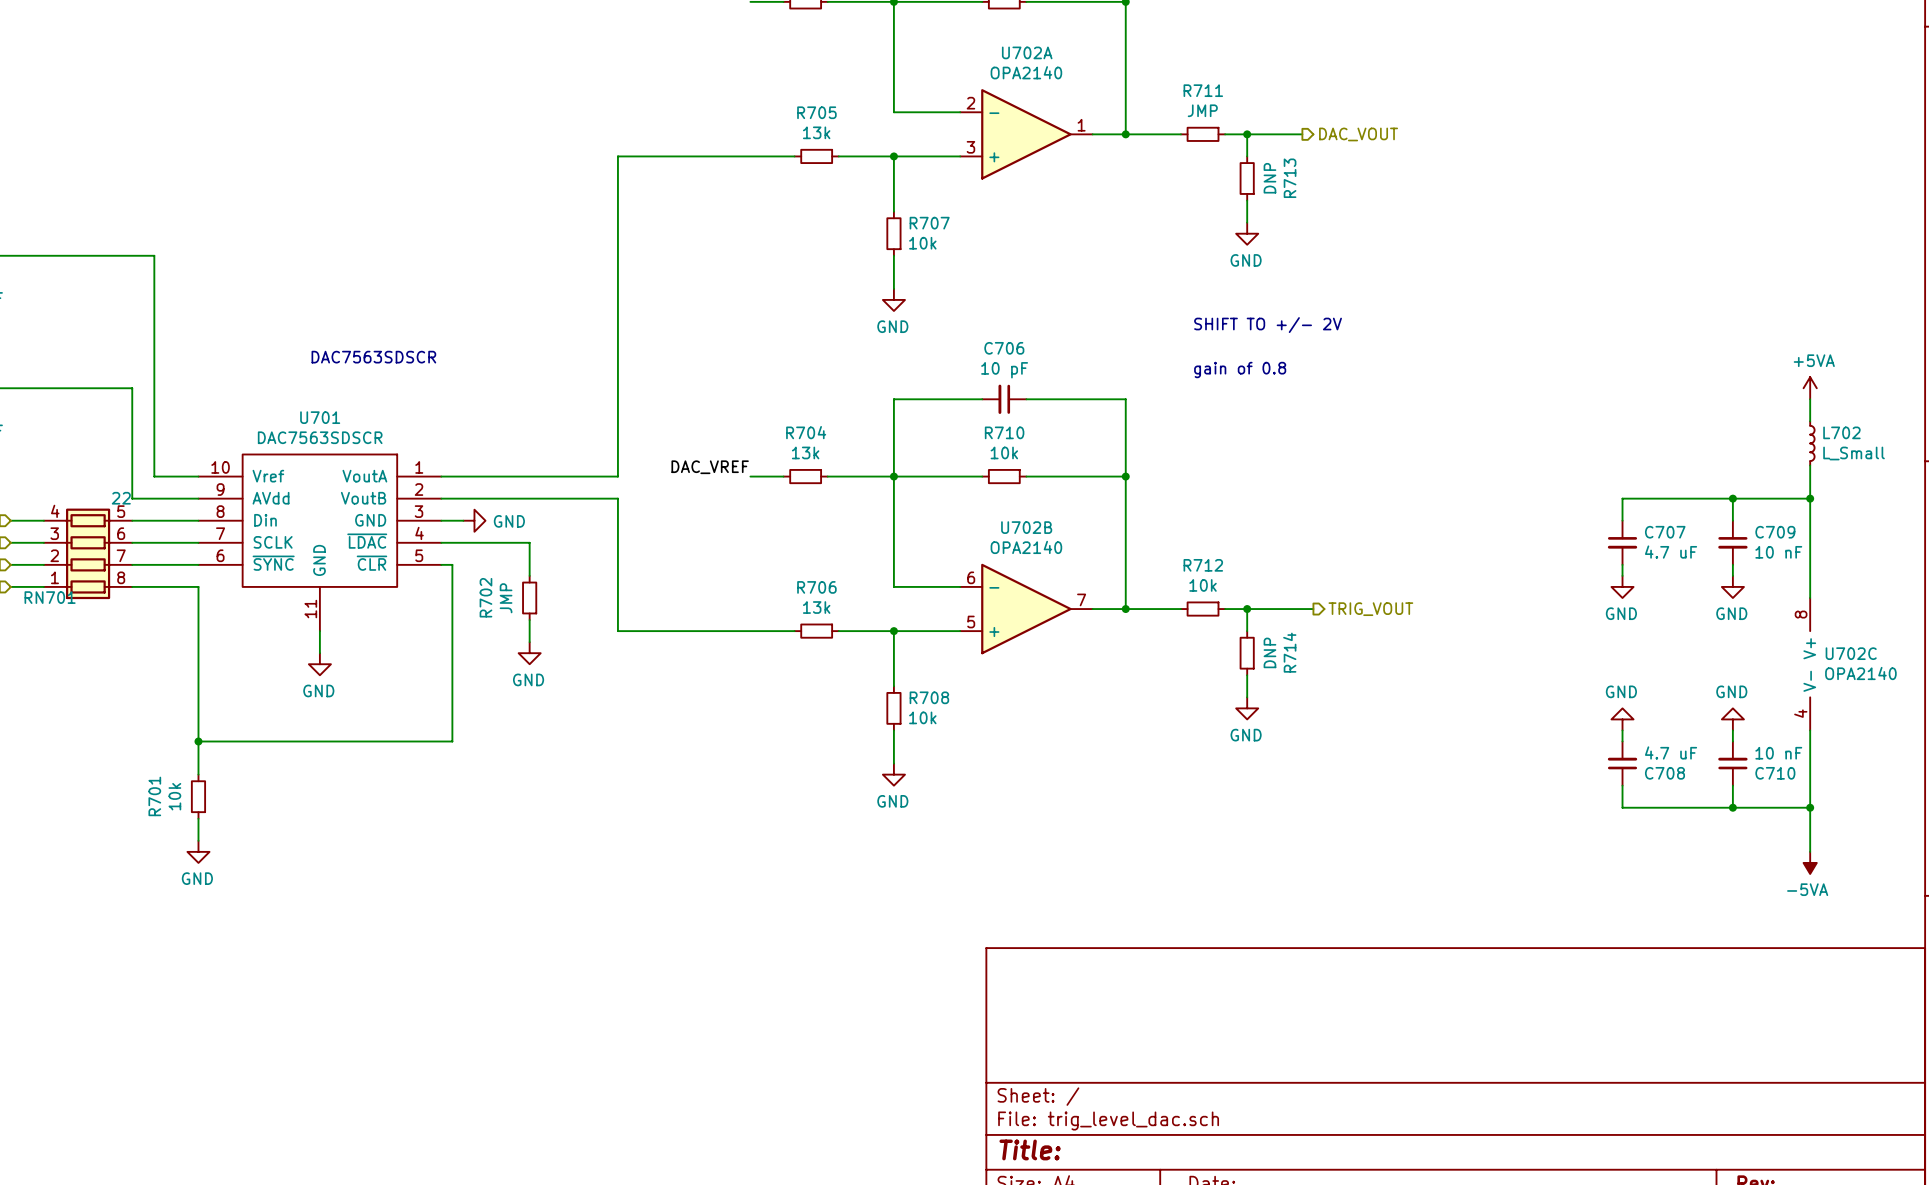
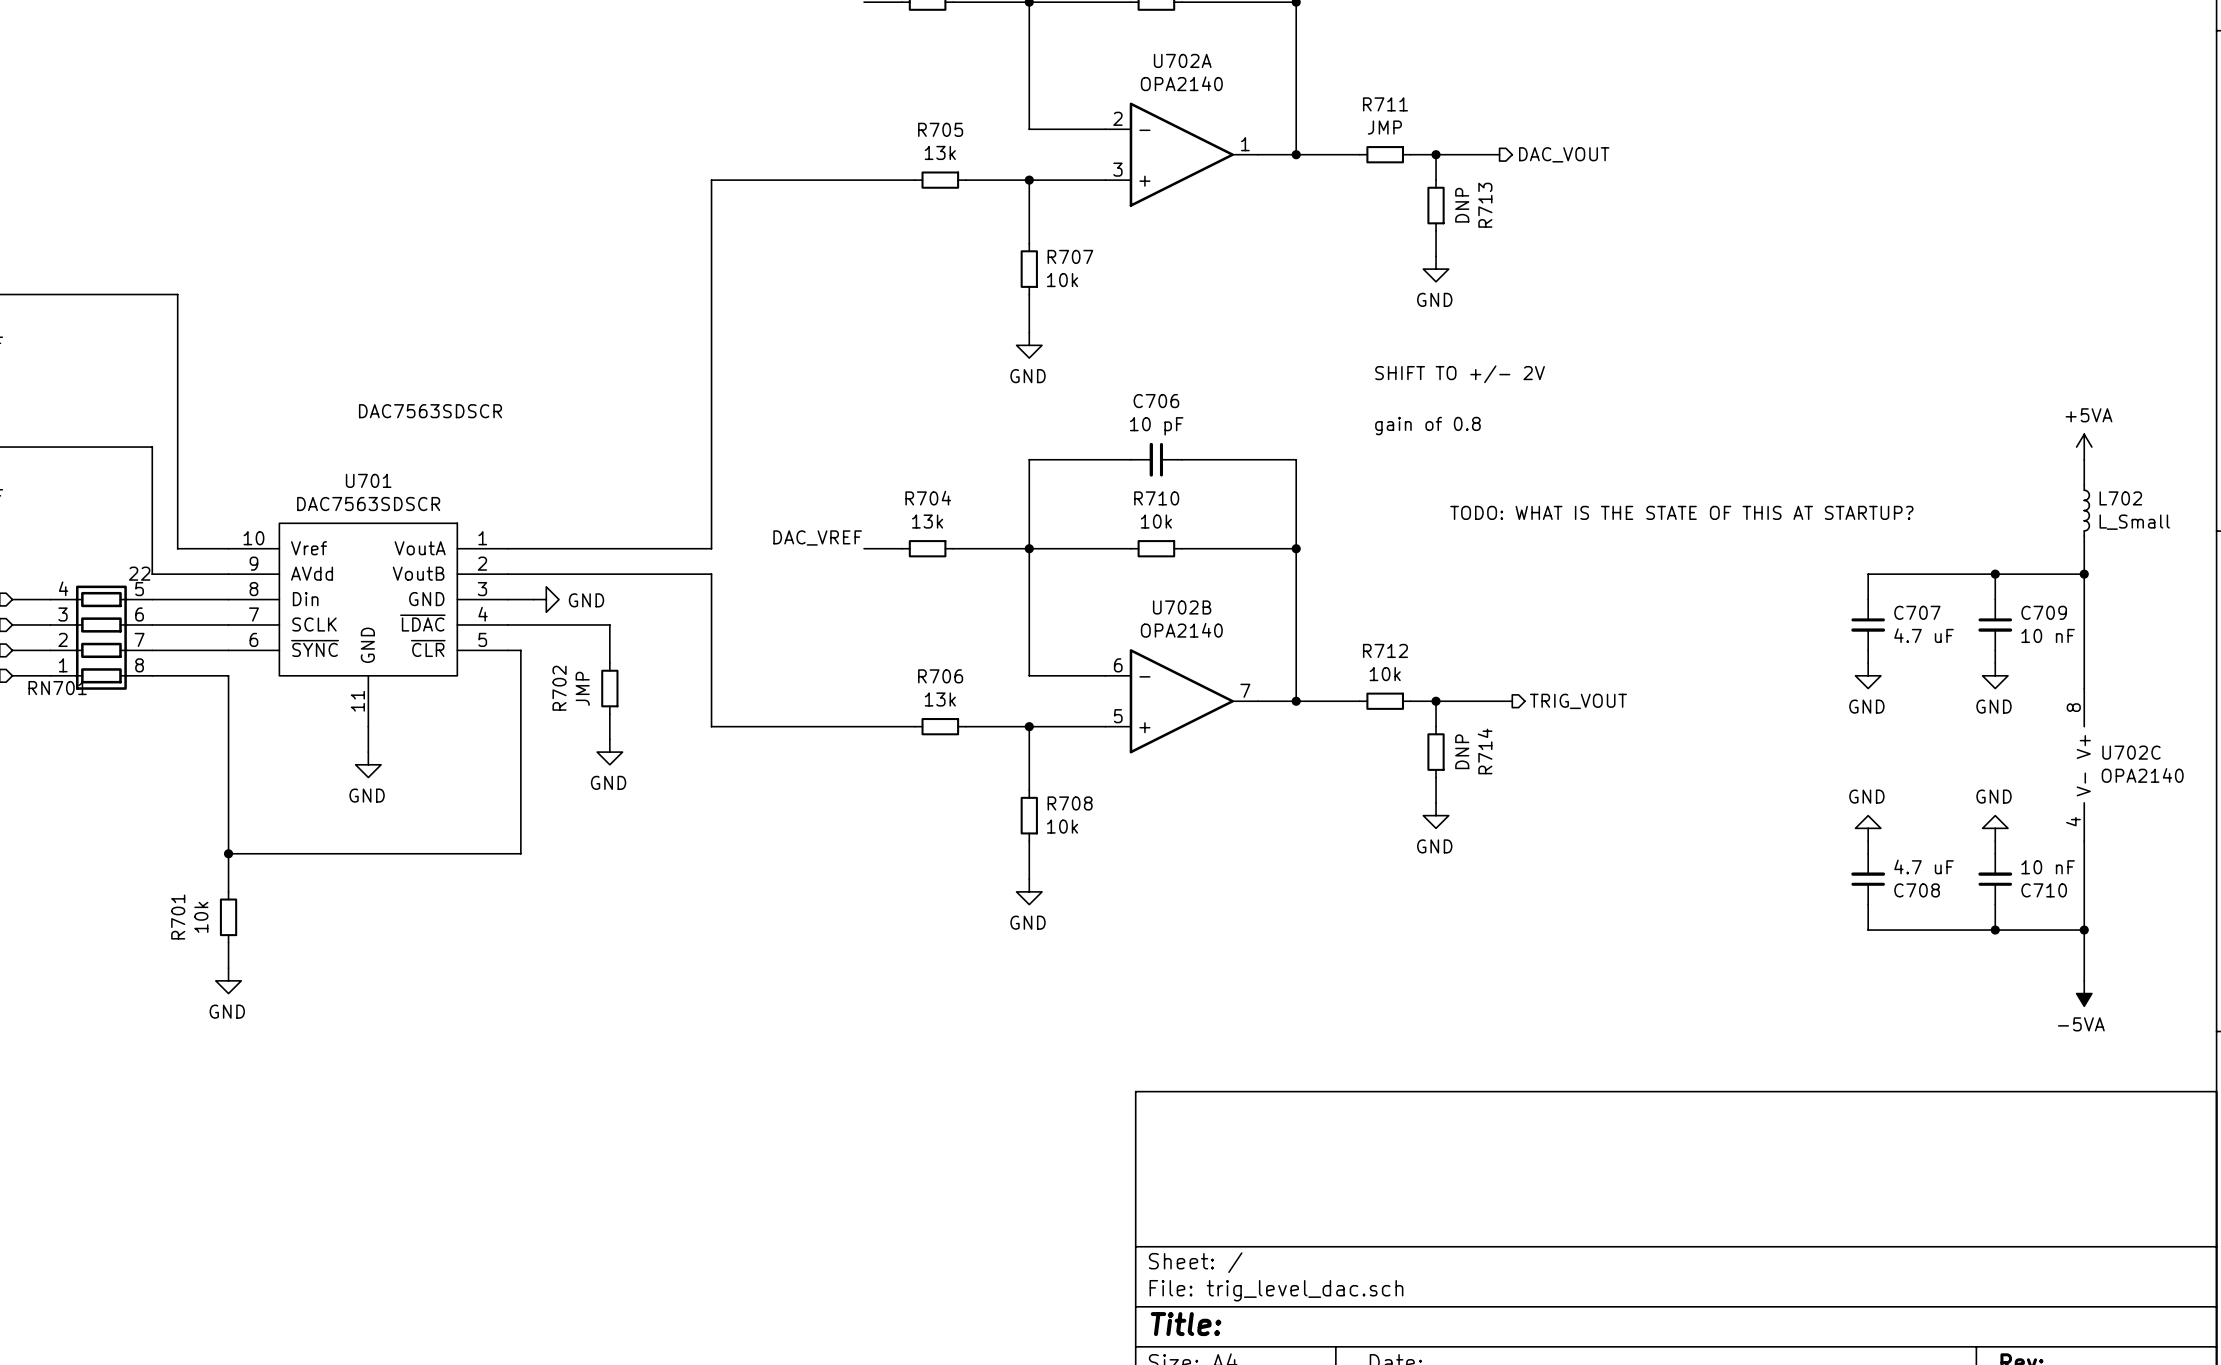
text: none -> TODO: WHAT IS THE STATE OF THIS AT STARTUP? (1681, 512)

